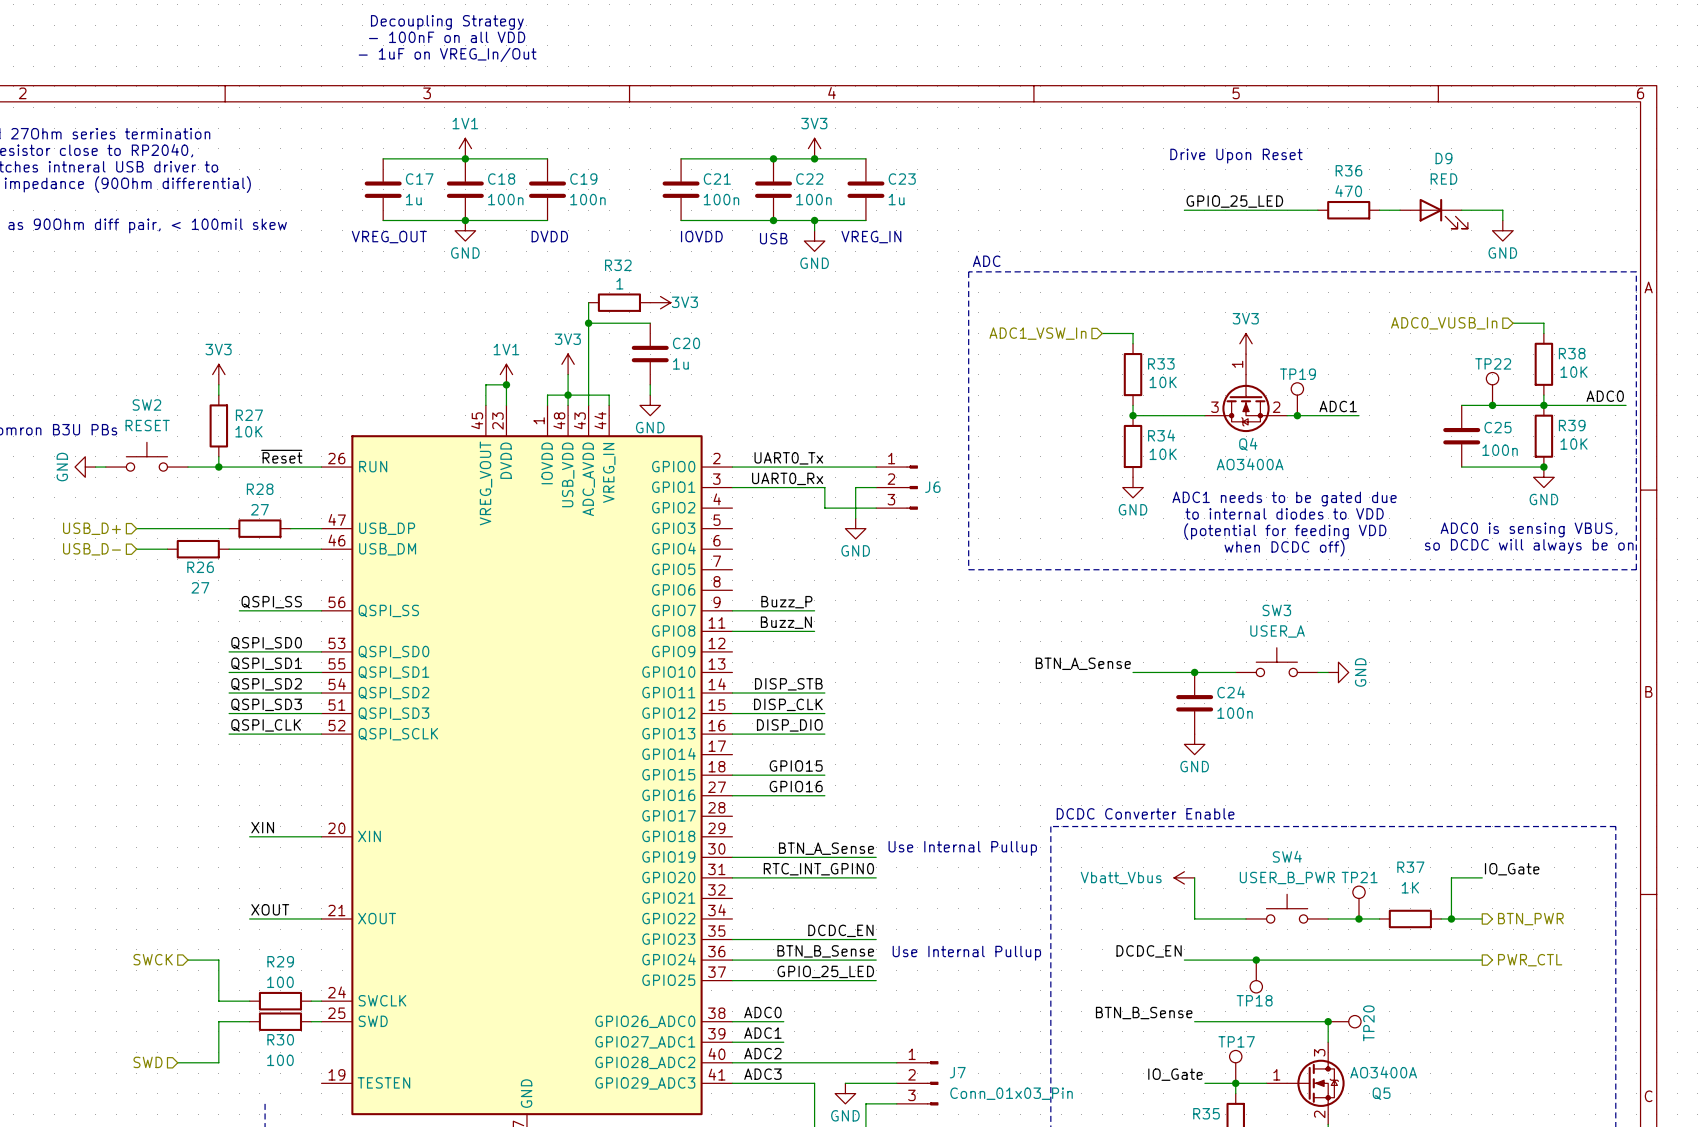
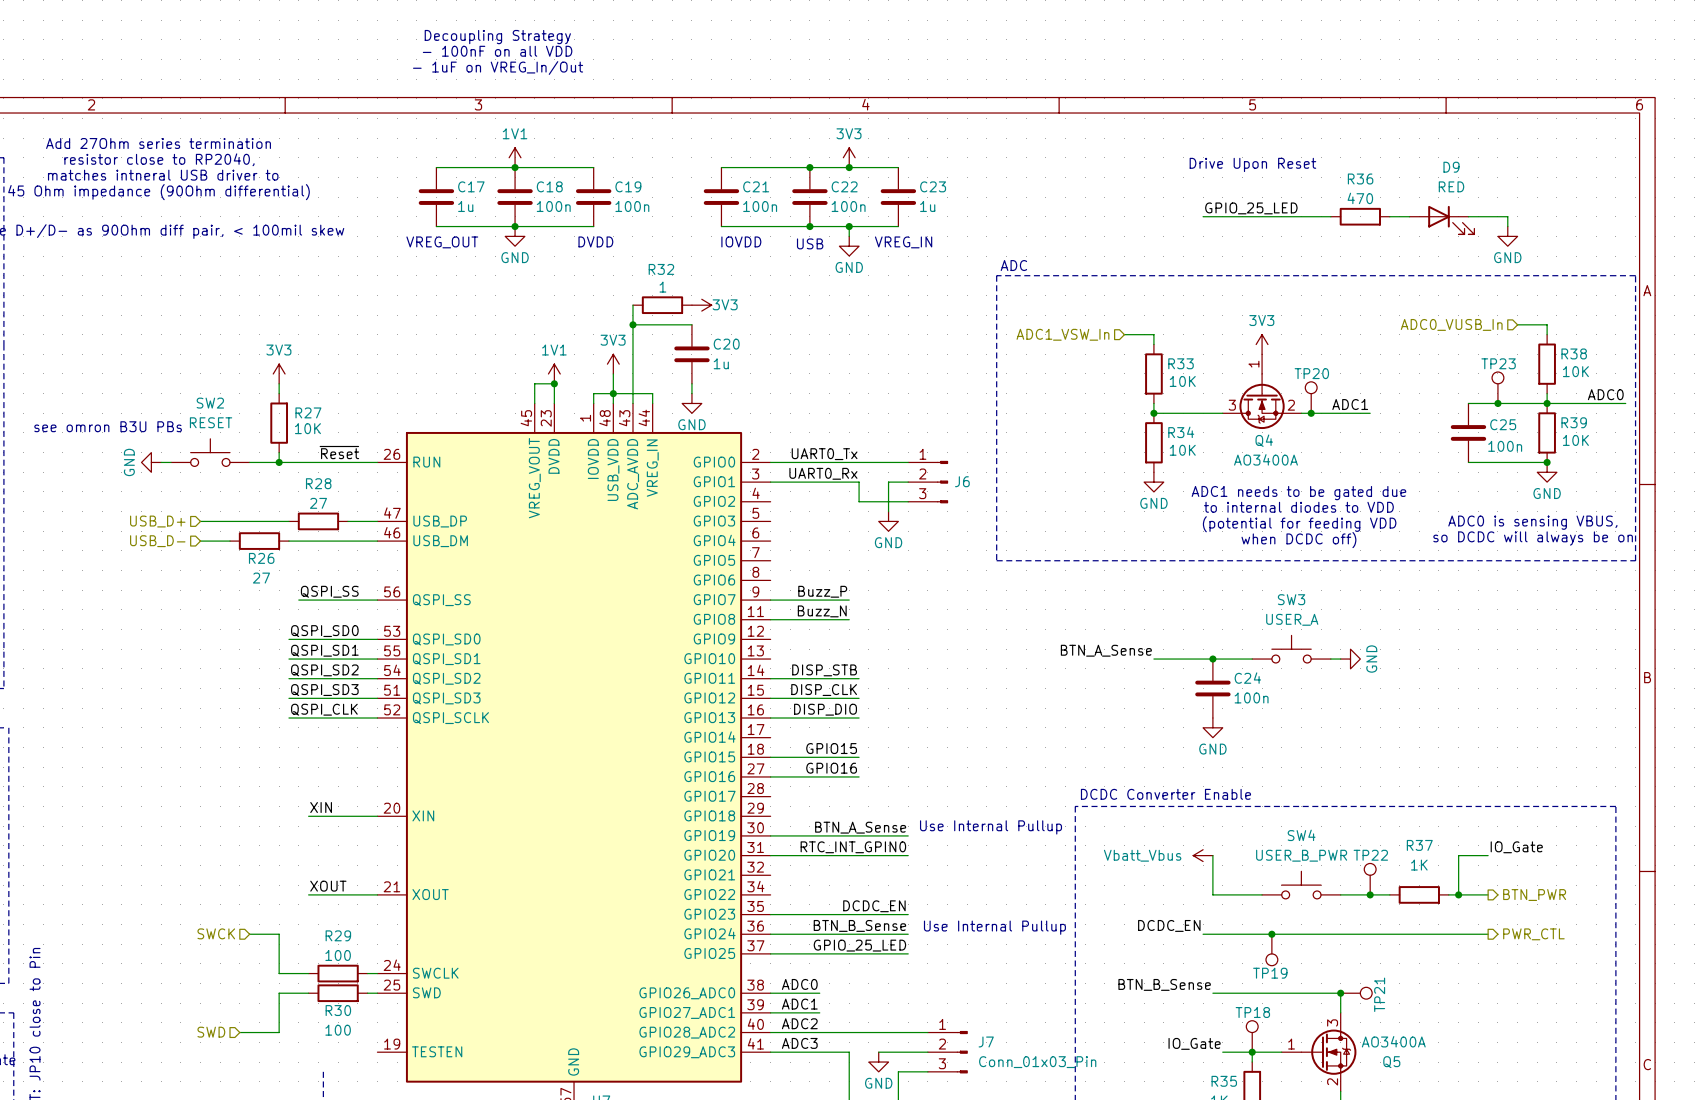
TP22 name: TP22 (1493, 363) -> TP23 (1498, 363)
TP19 name: TP19 (1298, 374) -> TP20 (1311, 373)
TP21 name: TP21 (1359, 877) -> TP22 (1370, 855)
TP18 name: TP18 (1254, 1000) -> TP19 (1270, 973)
TP20 name: TP20 (1368, 1023) -> TP21 (1379, 994)
TP17 name: TP17 (1236, 1041) -> TP18 (1252, 1012)

